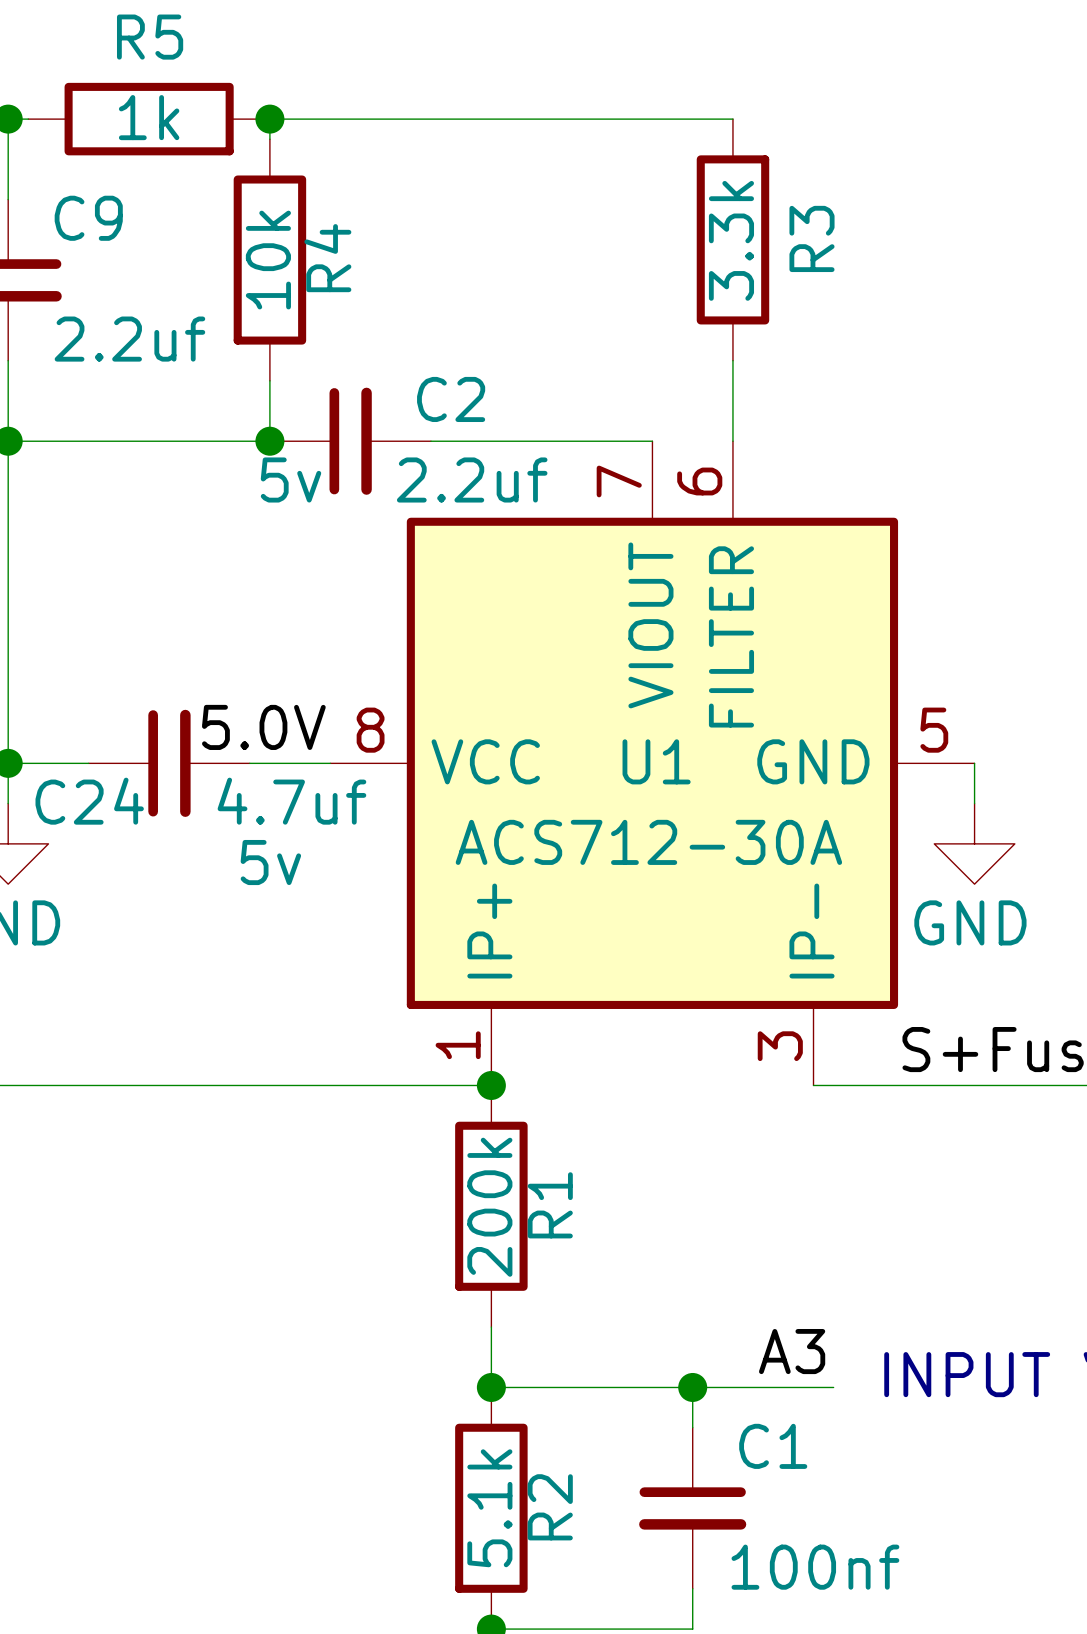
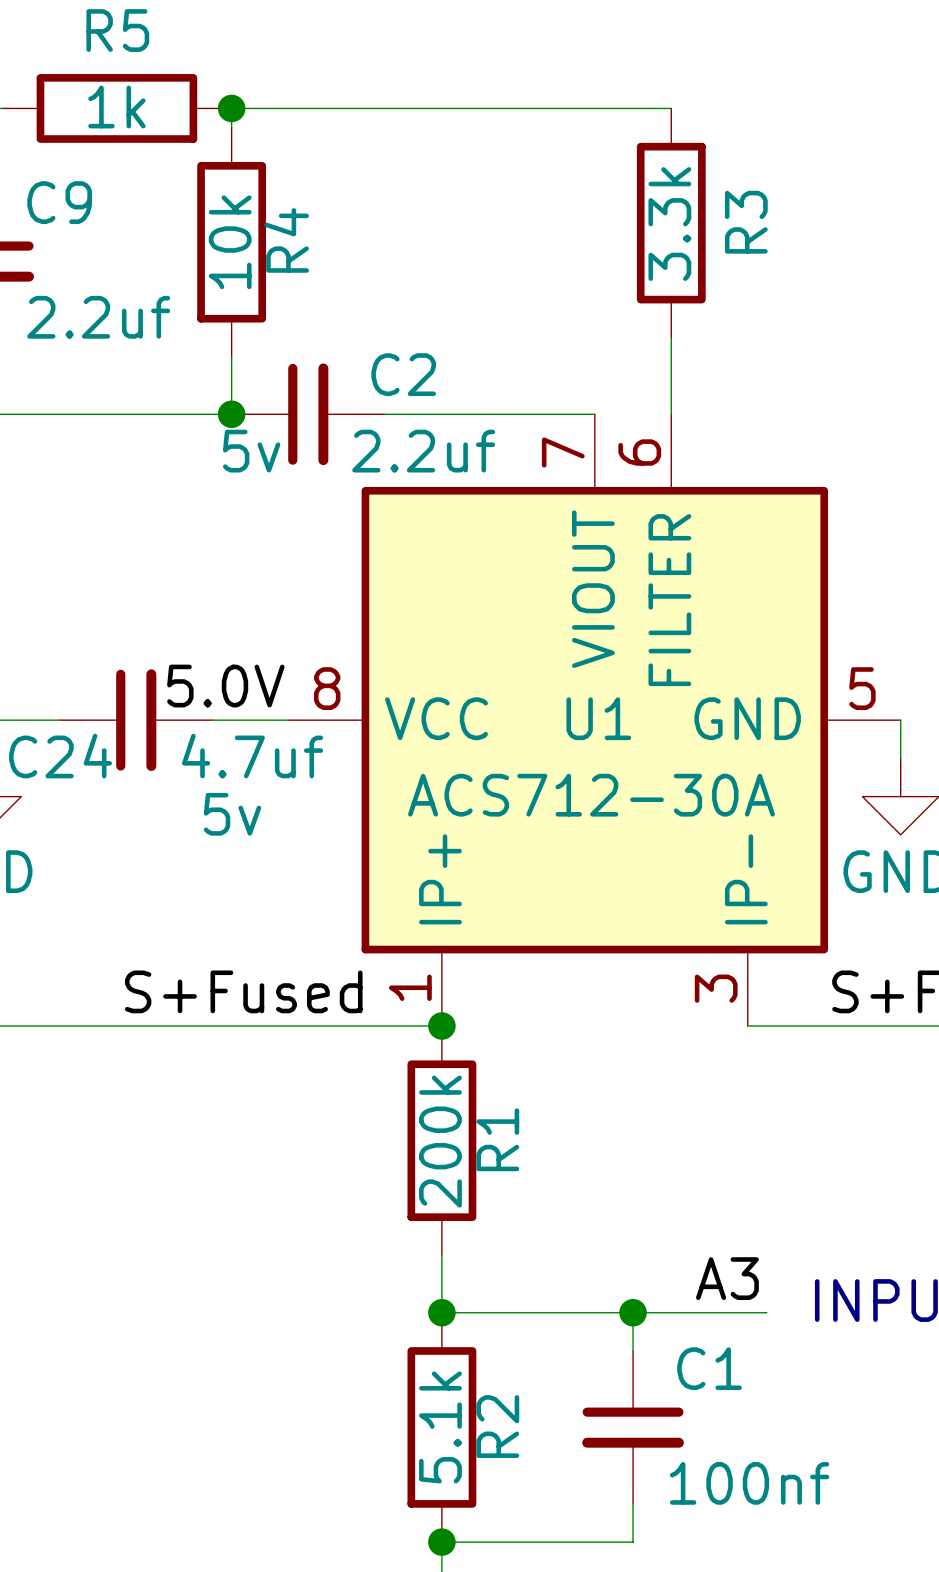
label: none -> S+Fused (243, 991)

